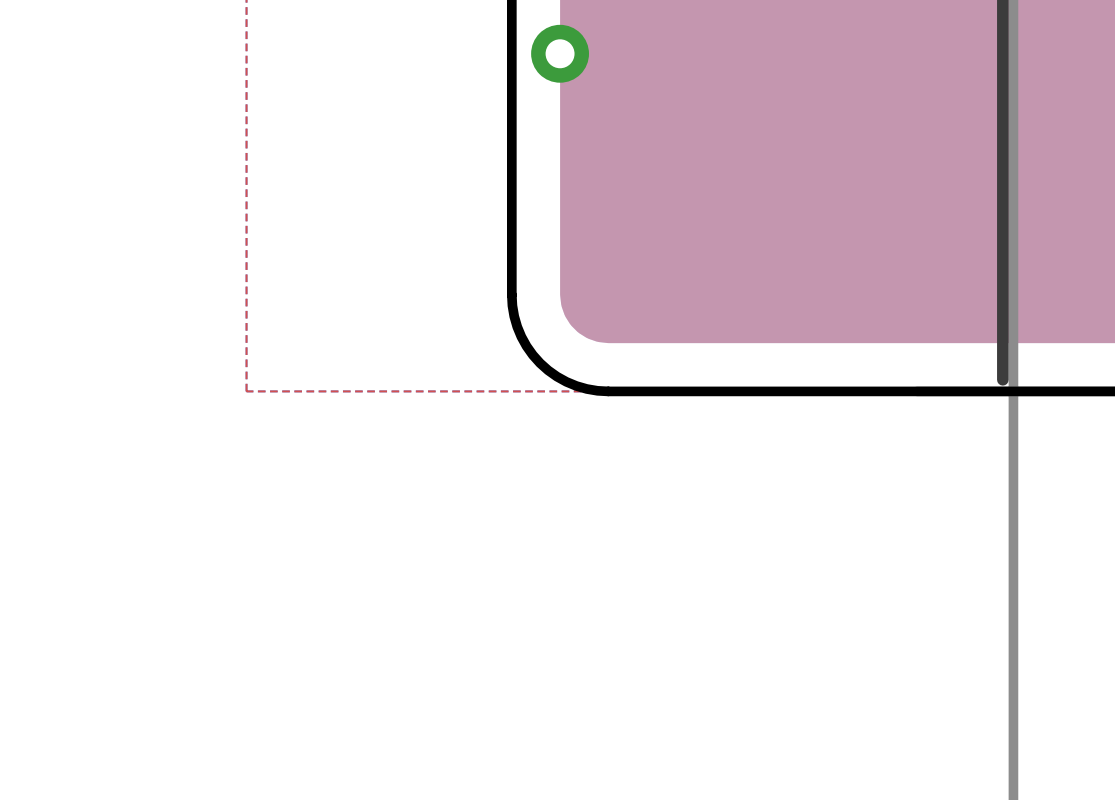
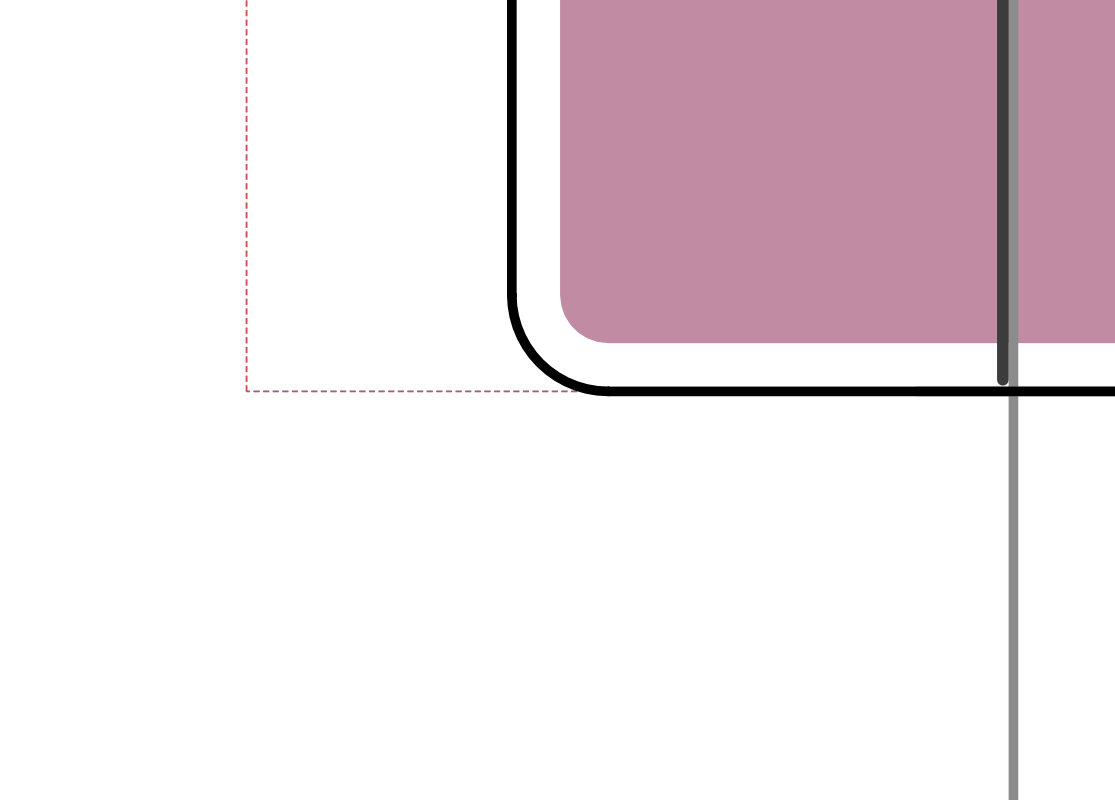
via: (560, 53) -> none

